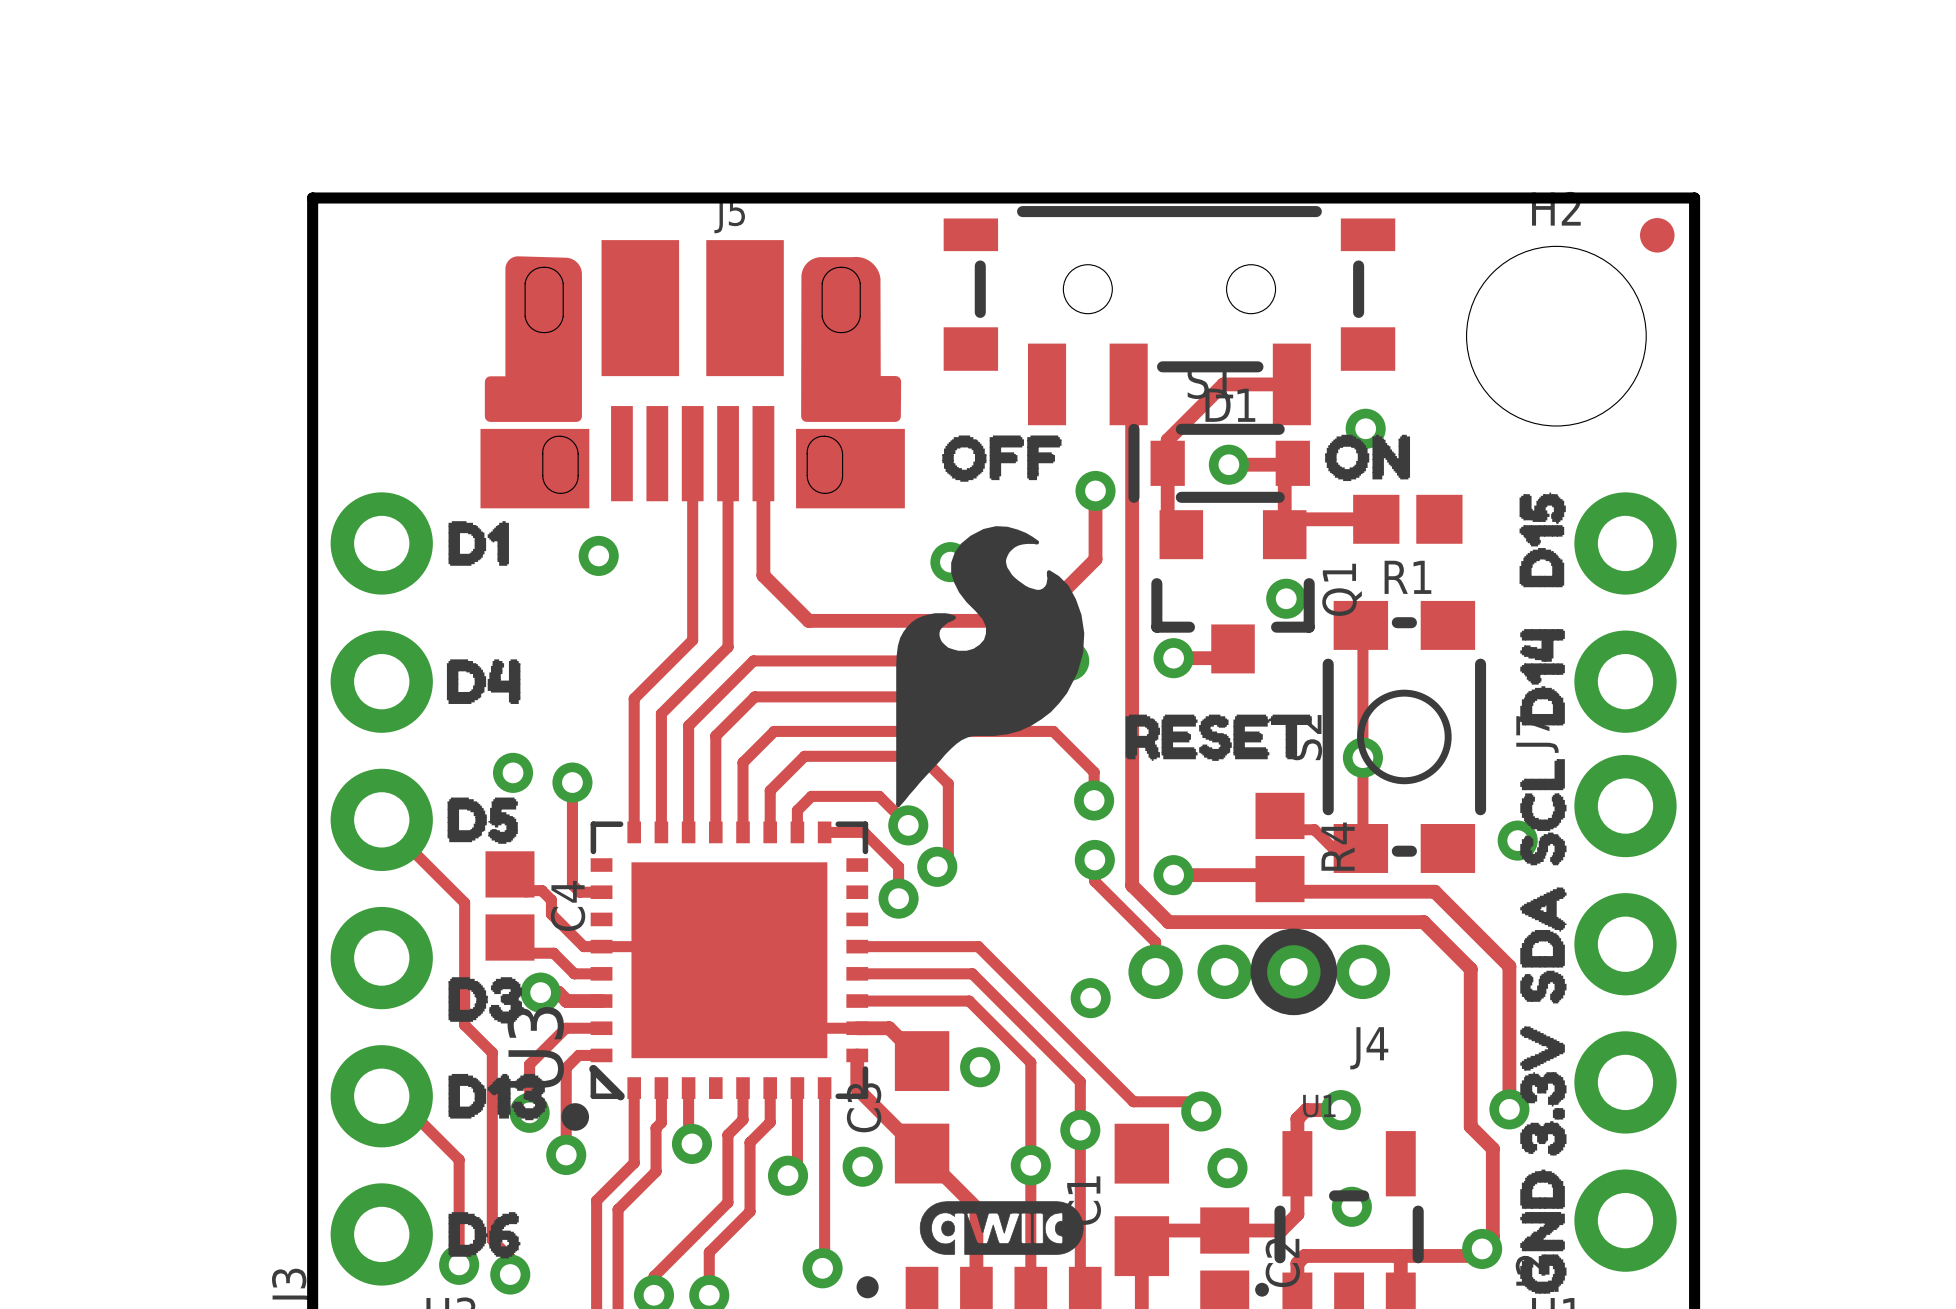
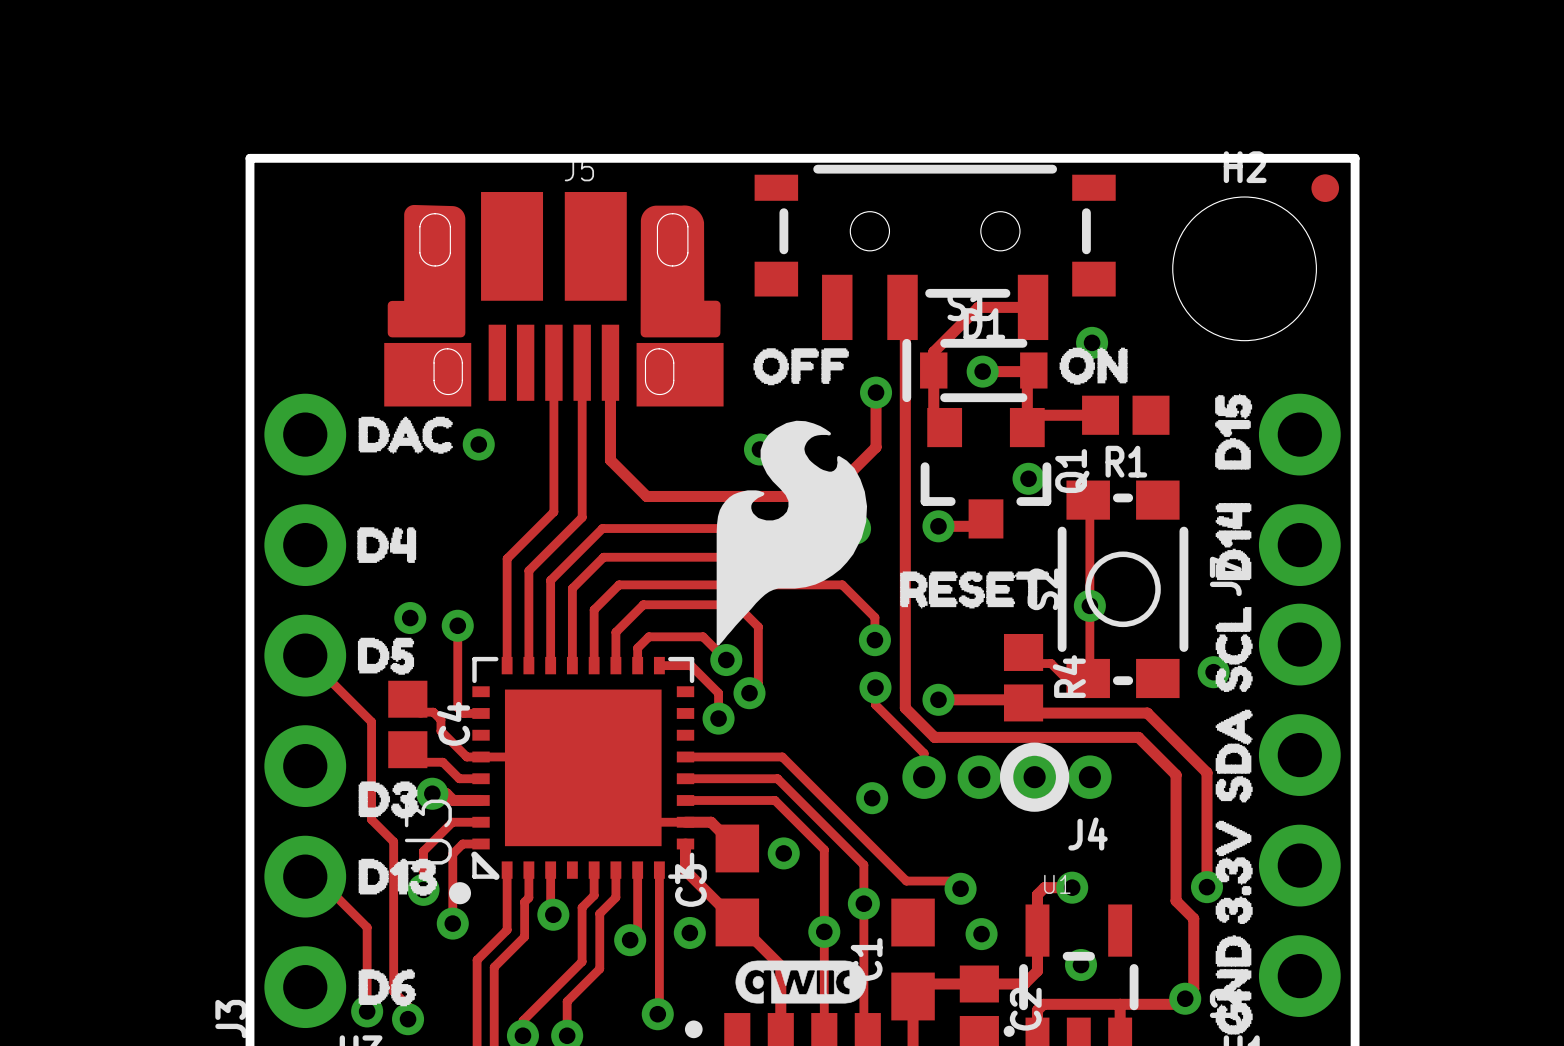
drawing shape: [448, 521, 509, 566] -> [358, 416, 453, 454]

